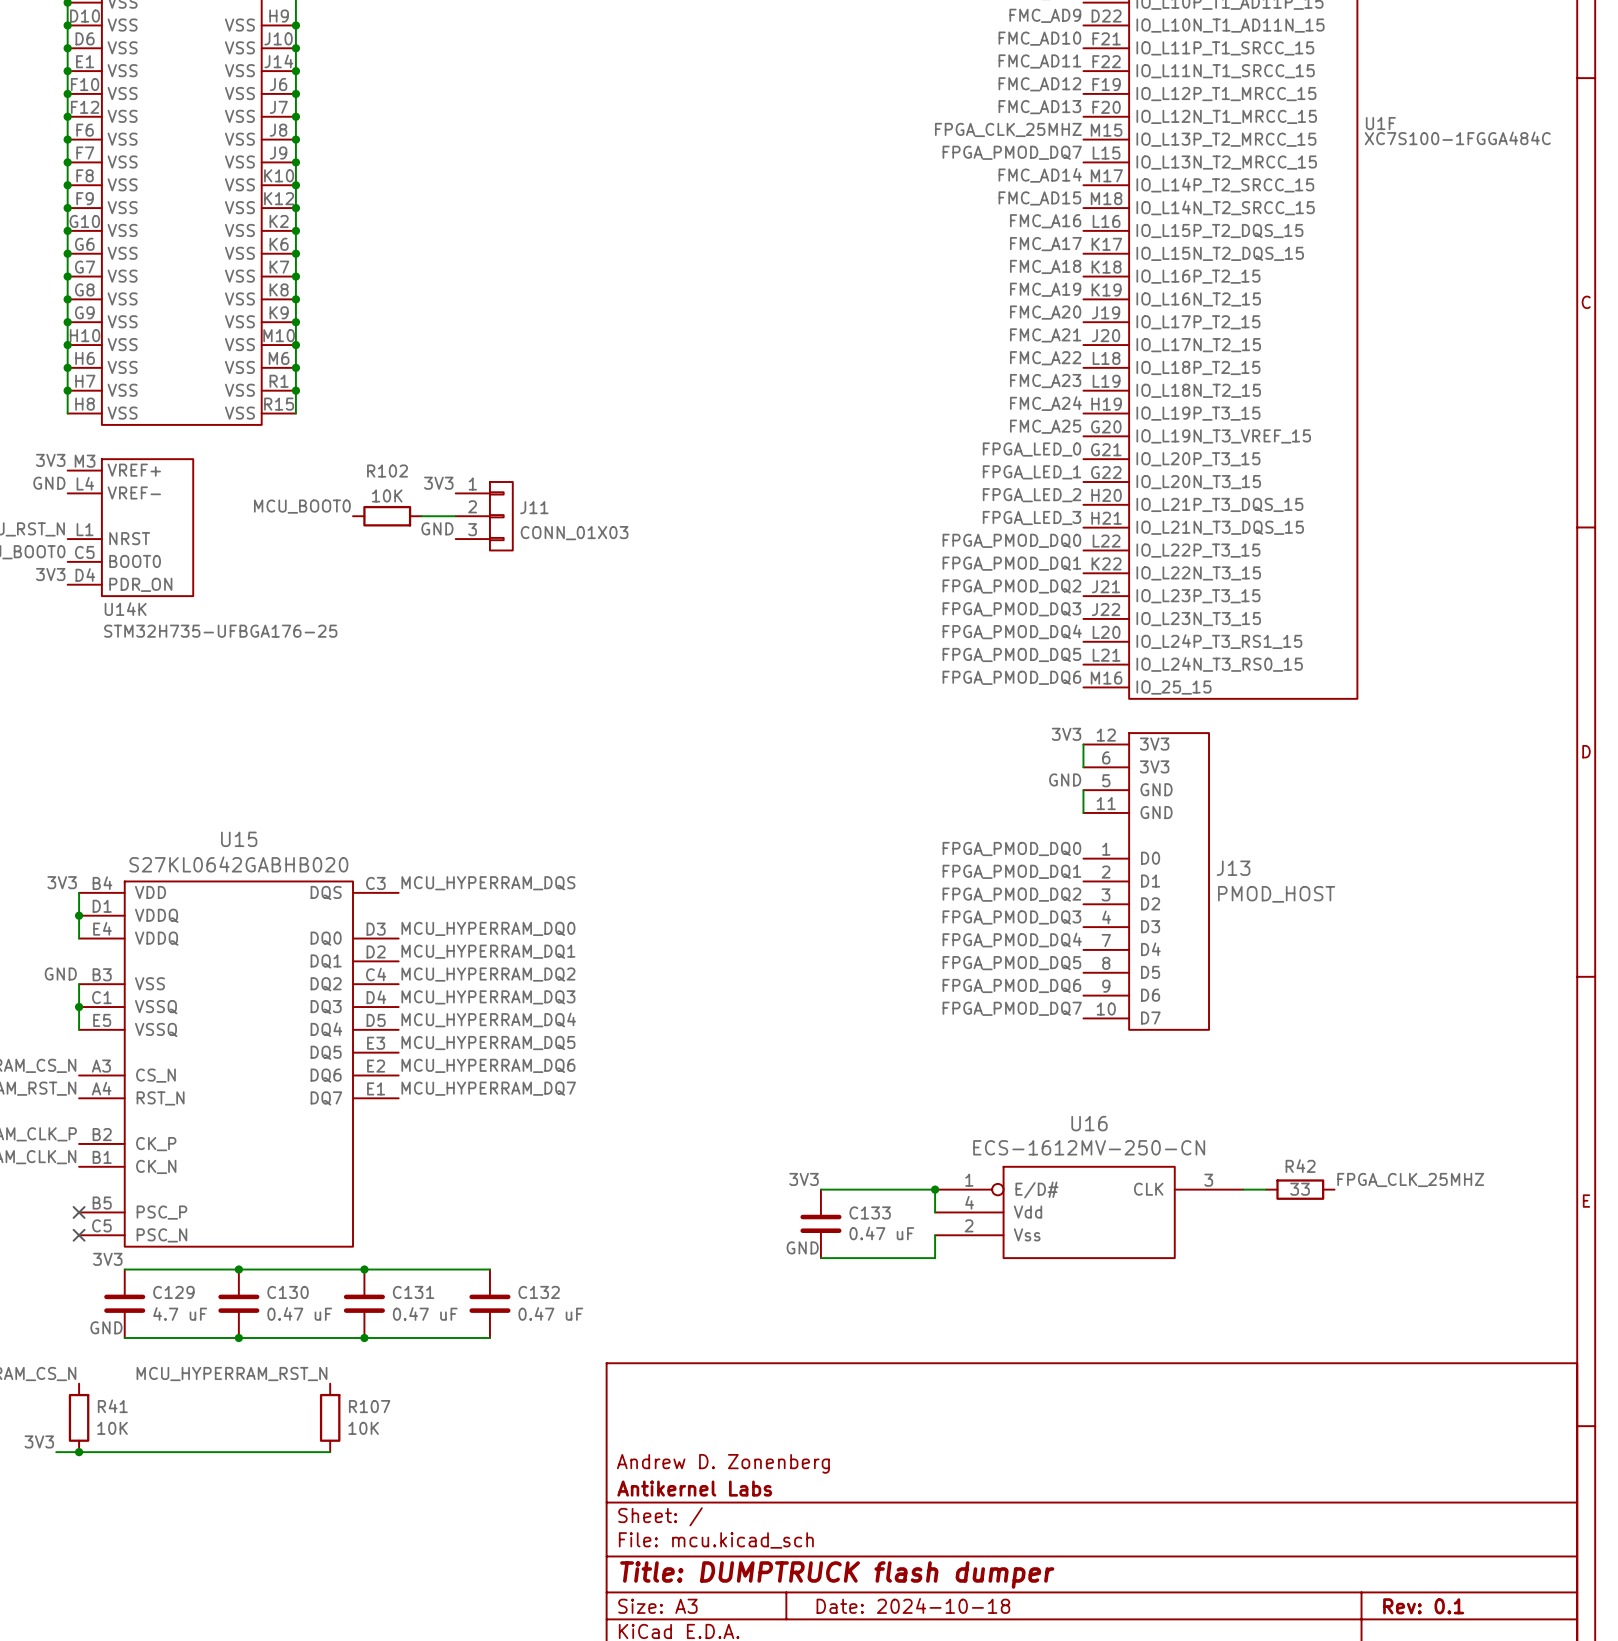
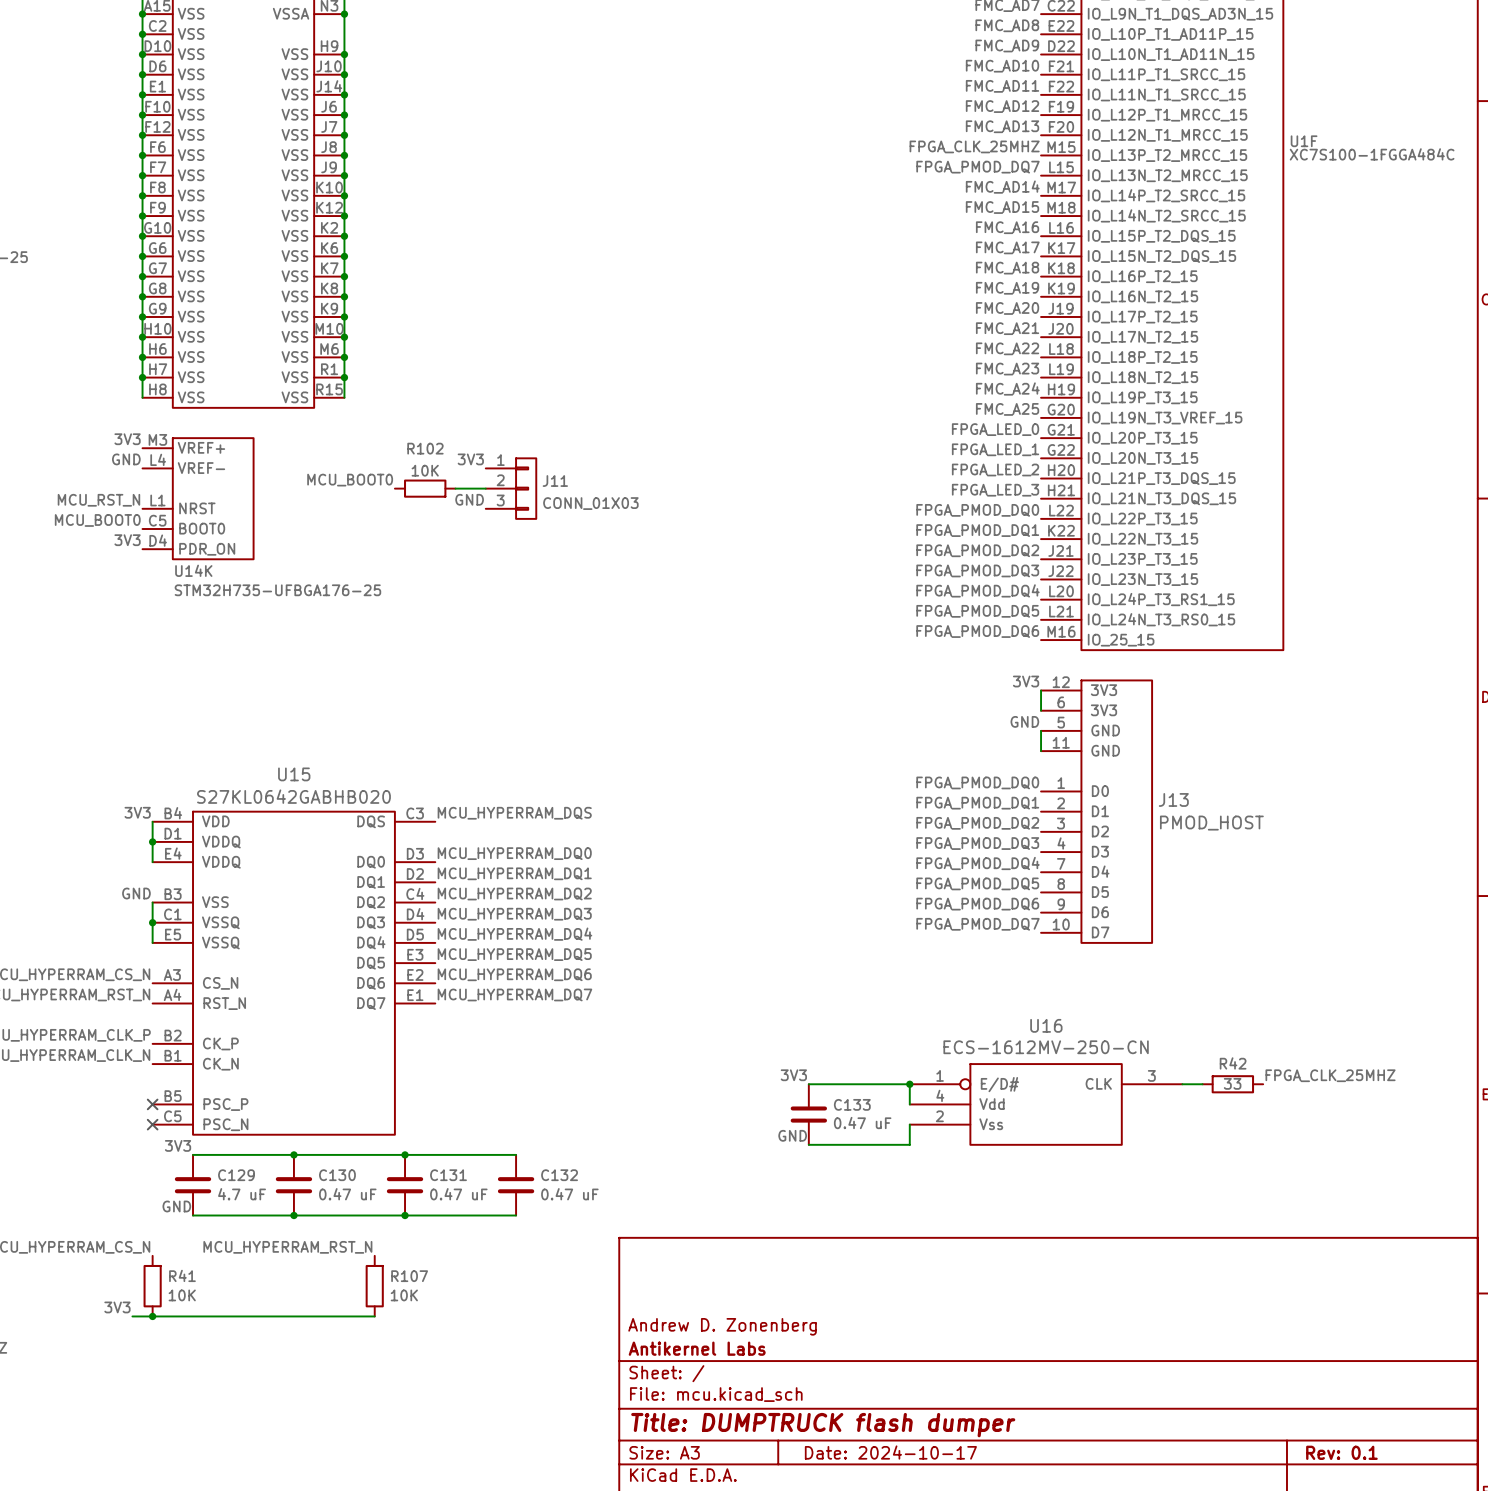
title block: Date: 2024-10-18 (913, 1605) -> Date: 2024-10-17 (890, 1452)

